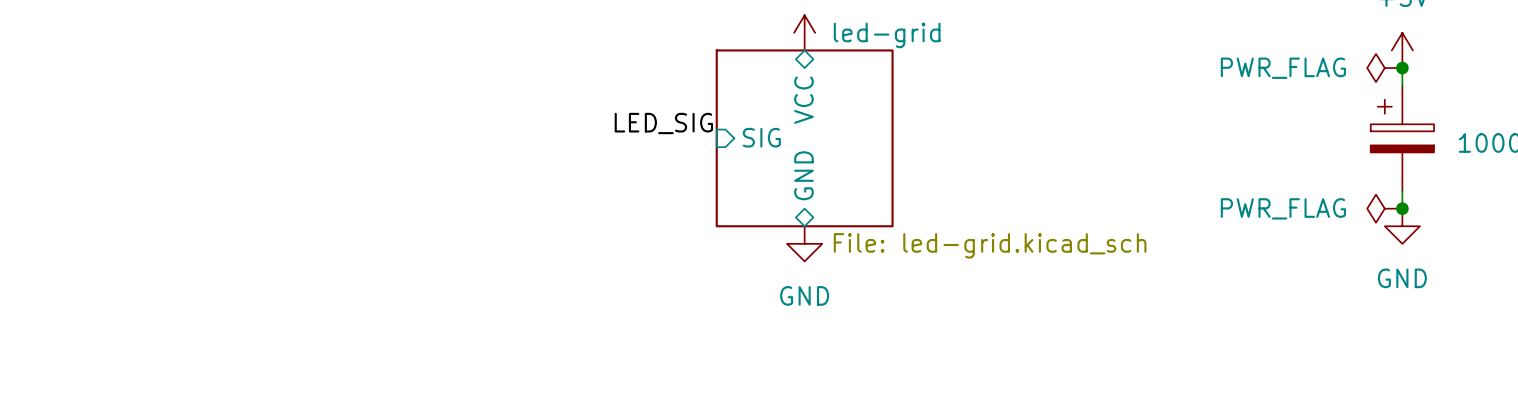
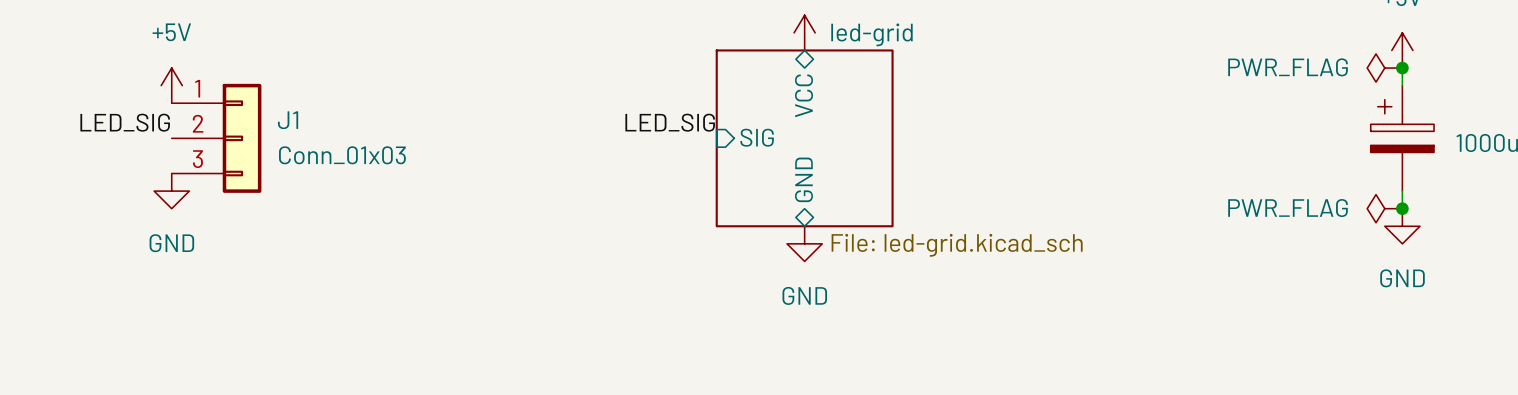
power symbol: none -> +5V (171, 85)
label: none -> LED_SIG (125, 122)
J1: none -> Conn_01x03 (216, 138)
power symbol: none -> GND (171, 191)

